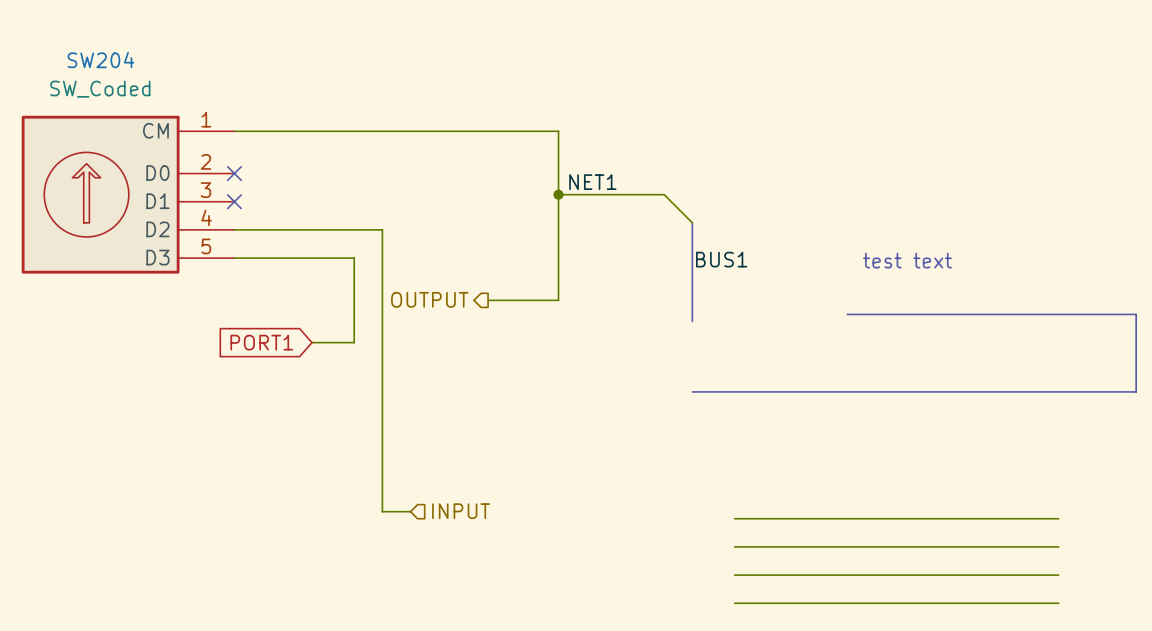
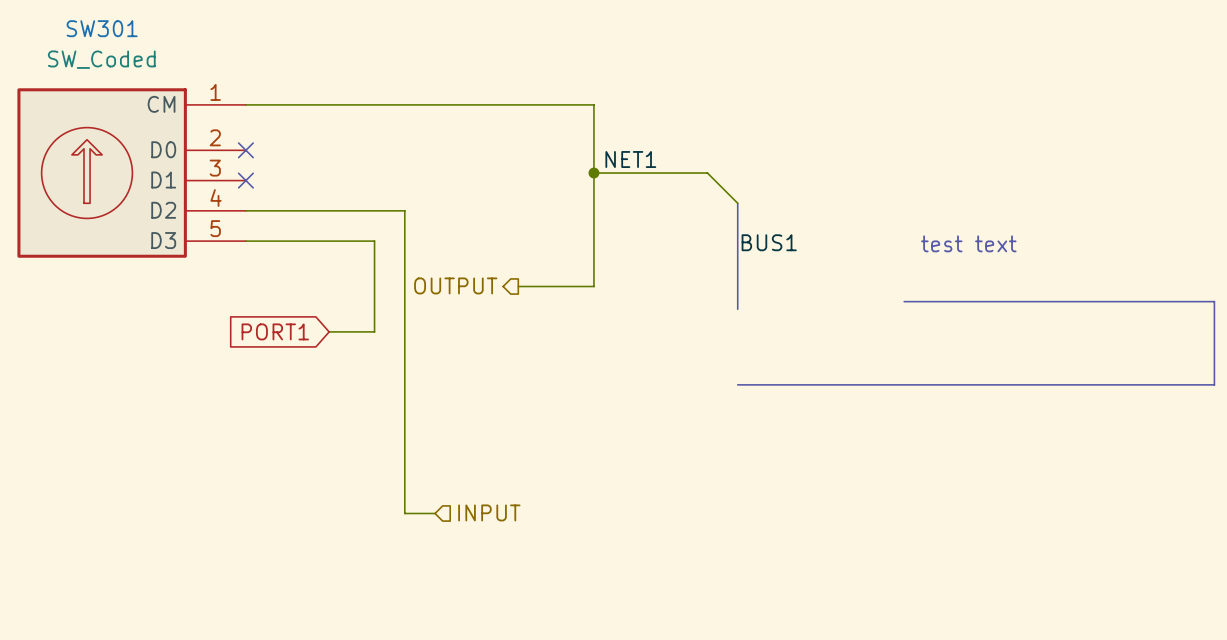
SW204 name: SW204 (100, 59) -> SW301 (102, 28)
wire: (734, 518) (1058, 518) -> none
wire: (734, 546) (1058, 546) -> none
wire: (734, 575) (1058, 575) -> none
wire: (734, 603) (1058, 603) -> none

